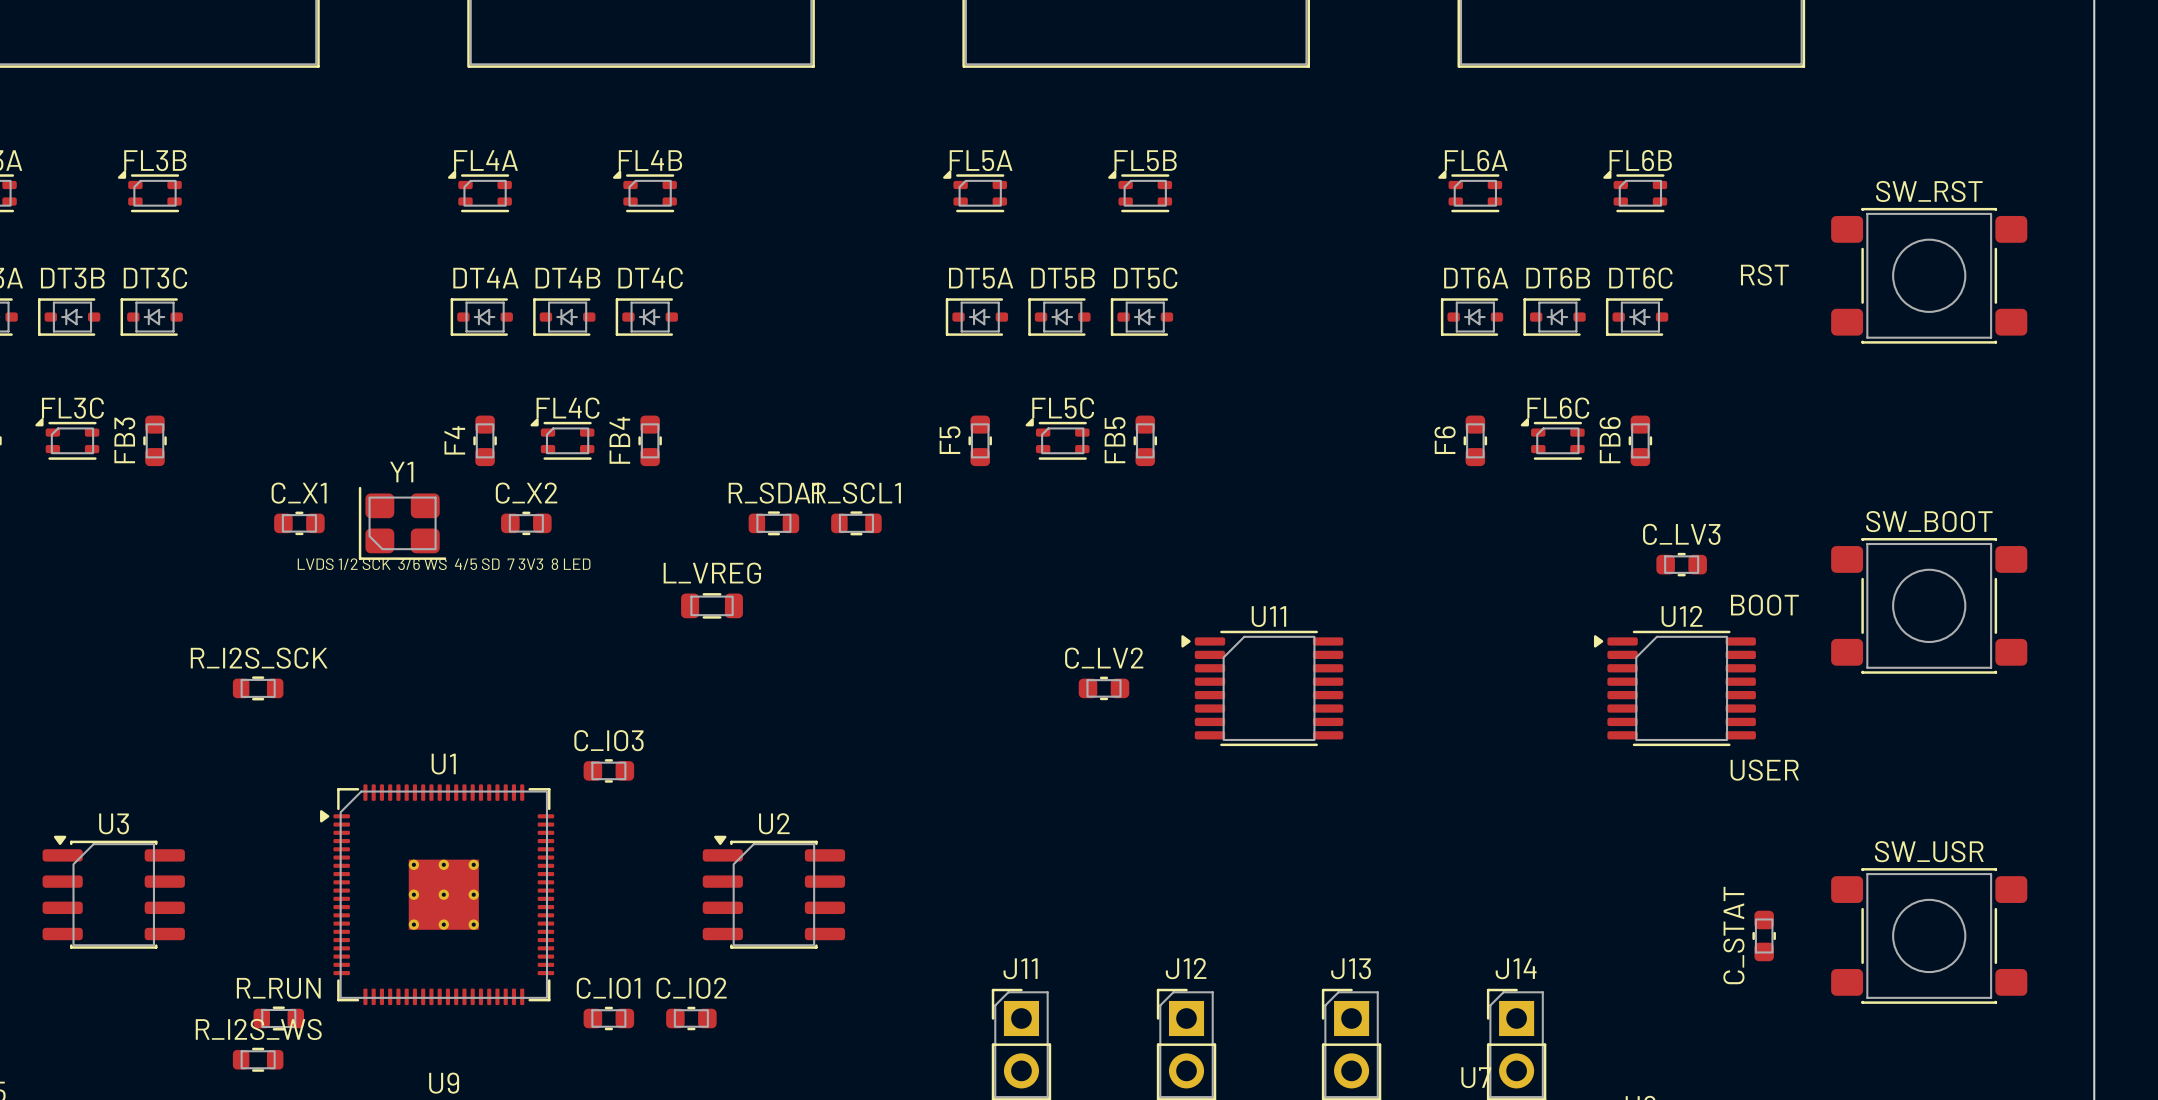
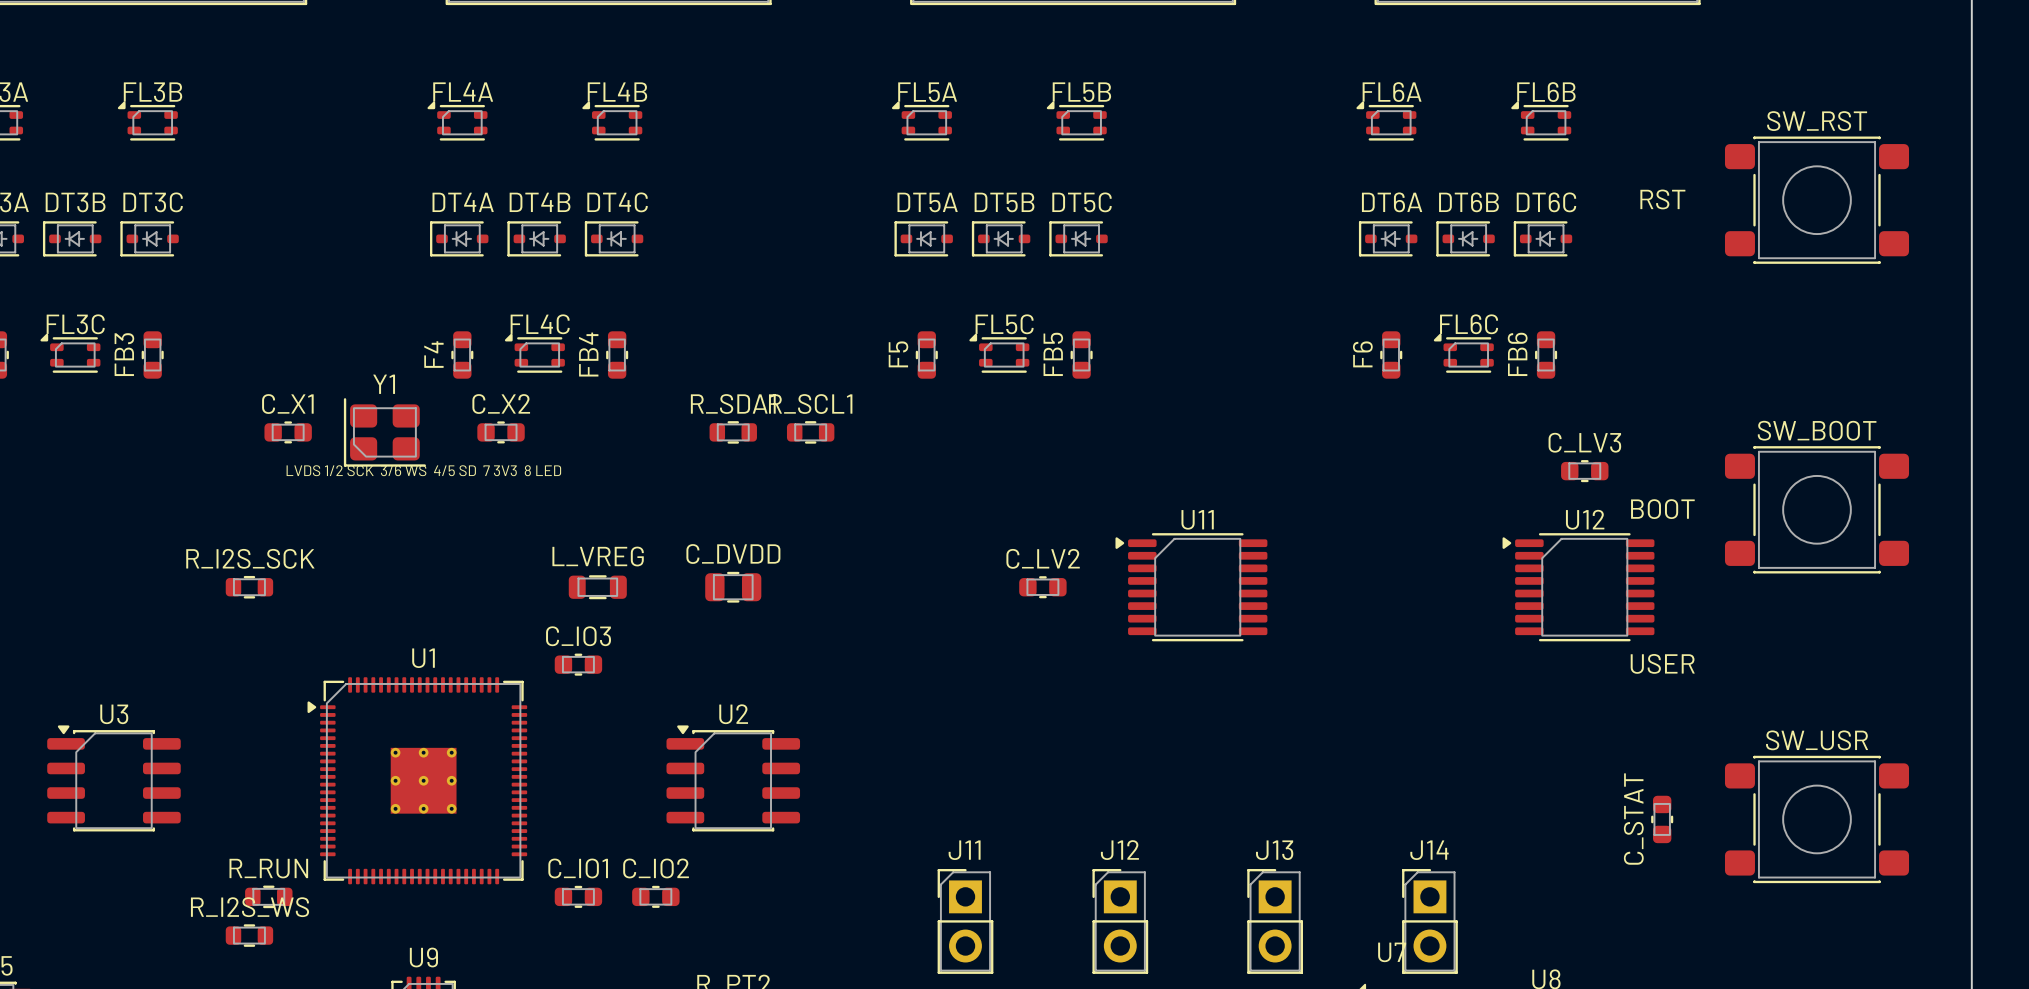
L_VREG position: (712, 605) -> (597, 587)
C_DVDD: none -> (733, 587)

